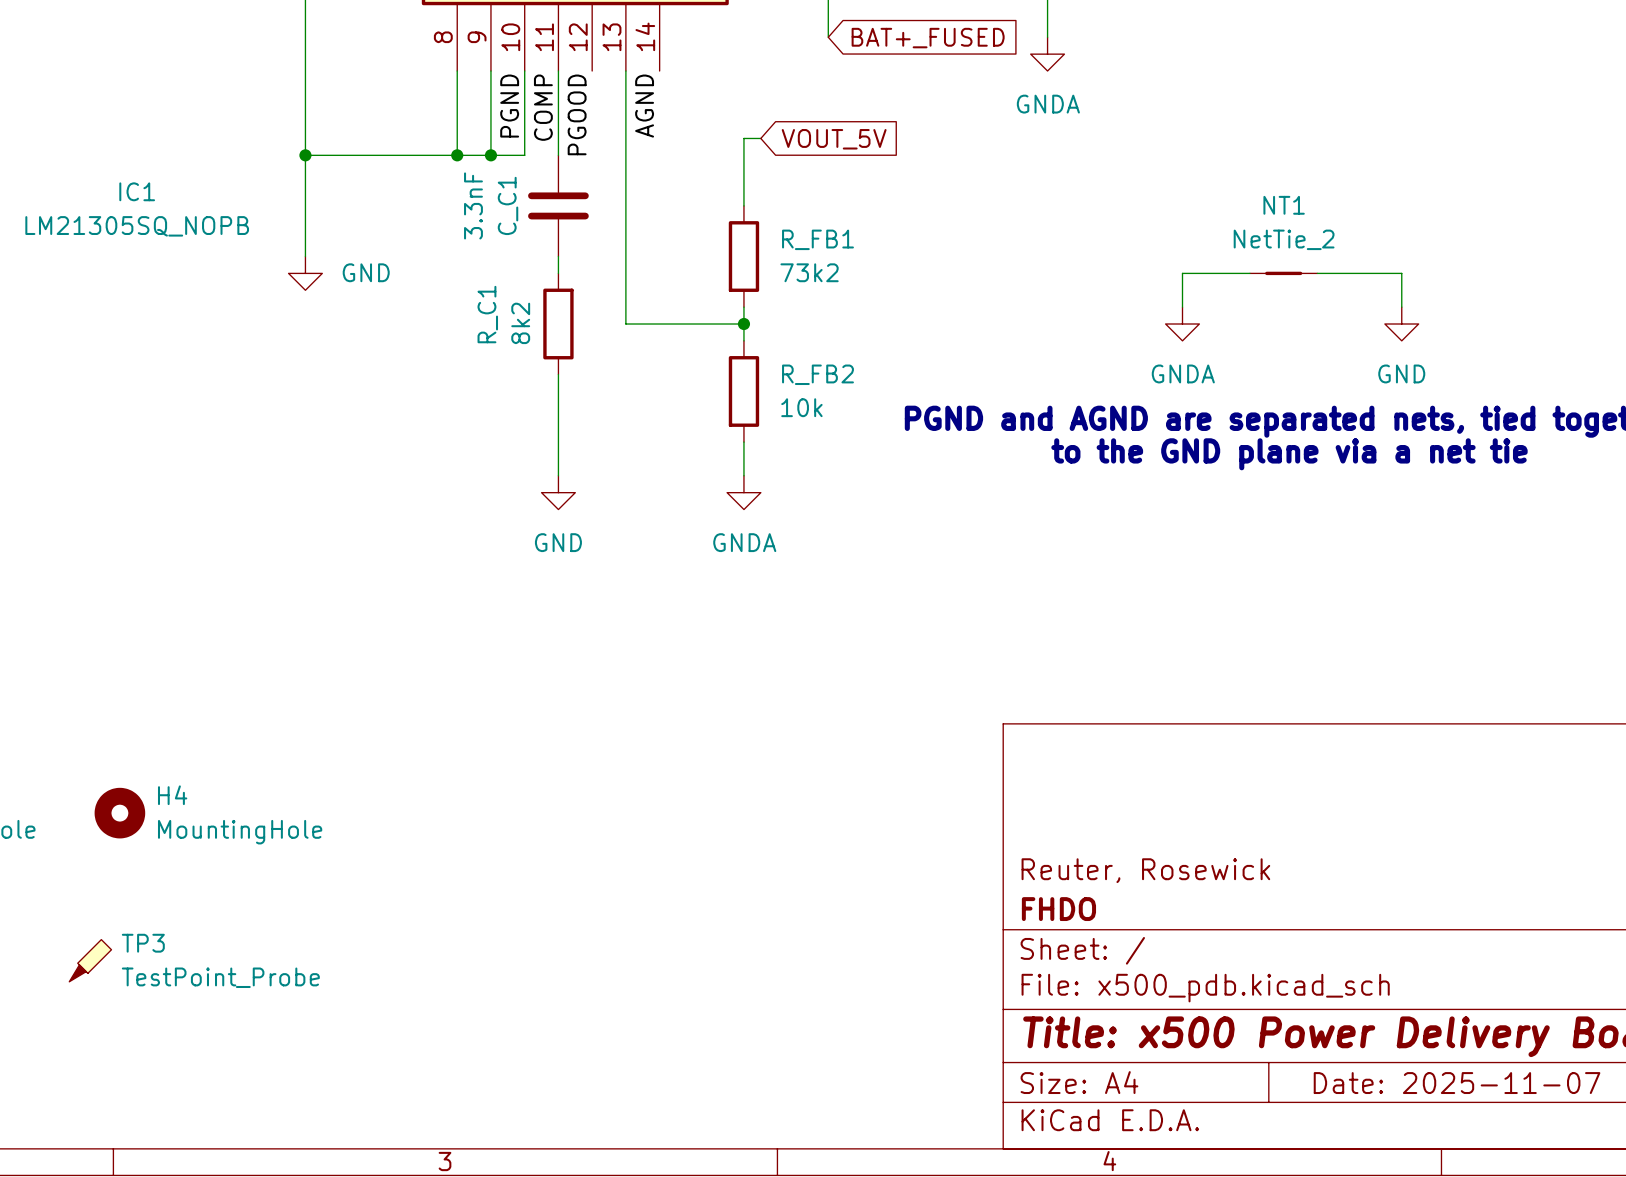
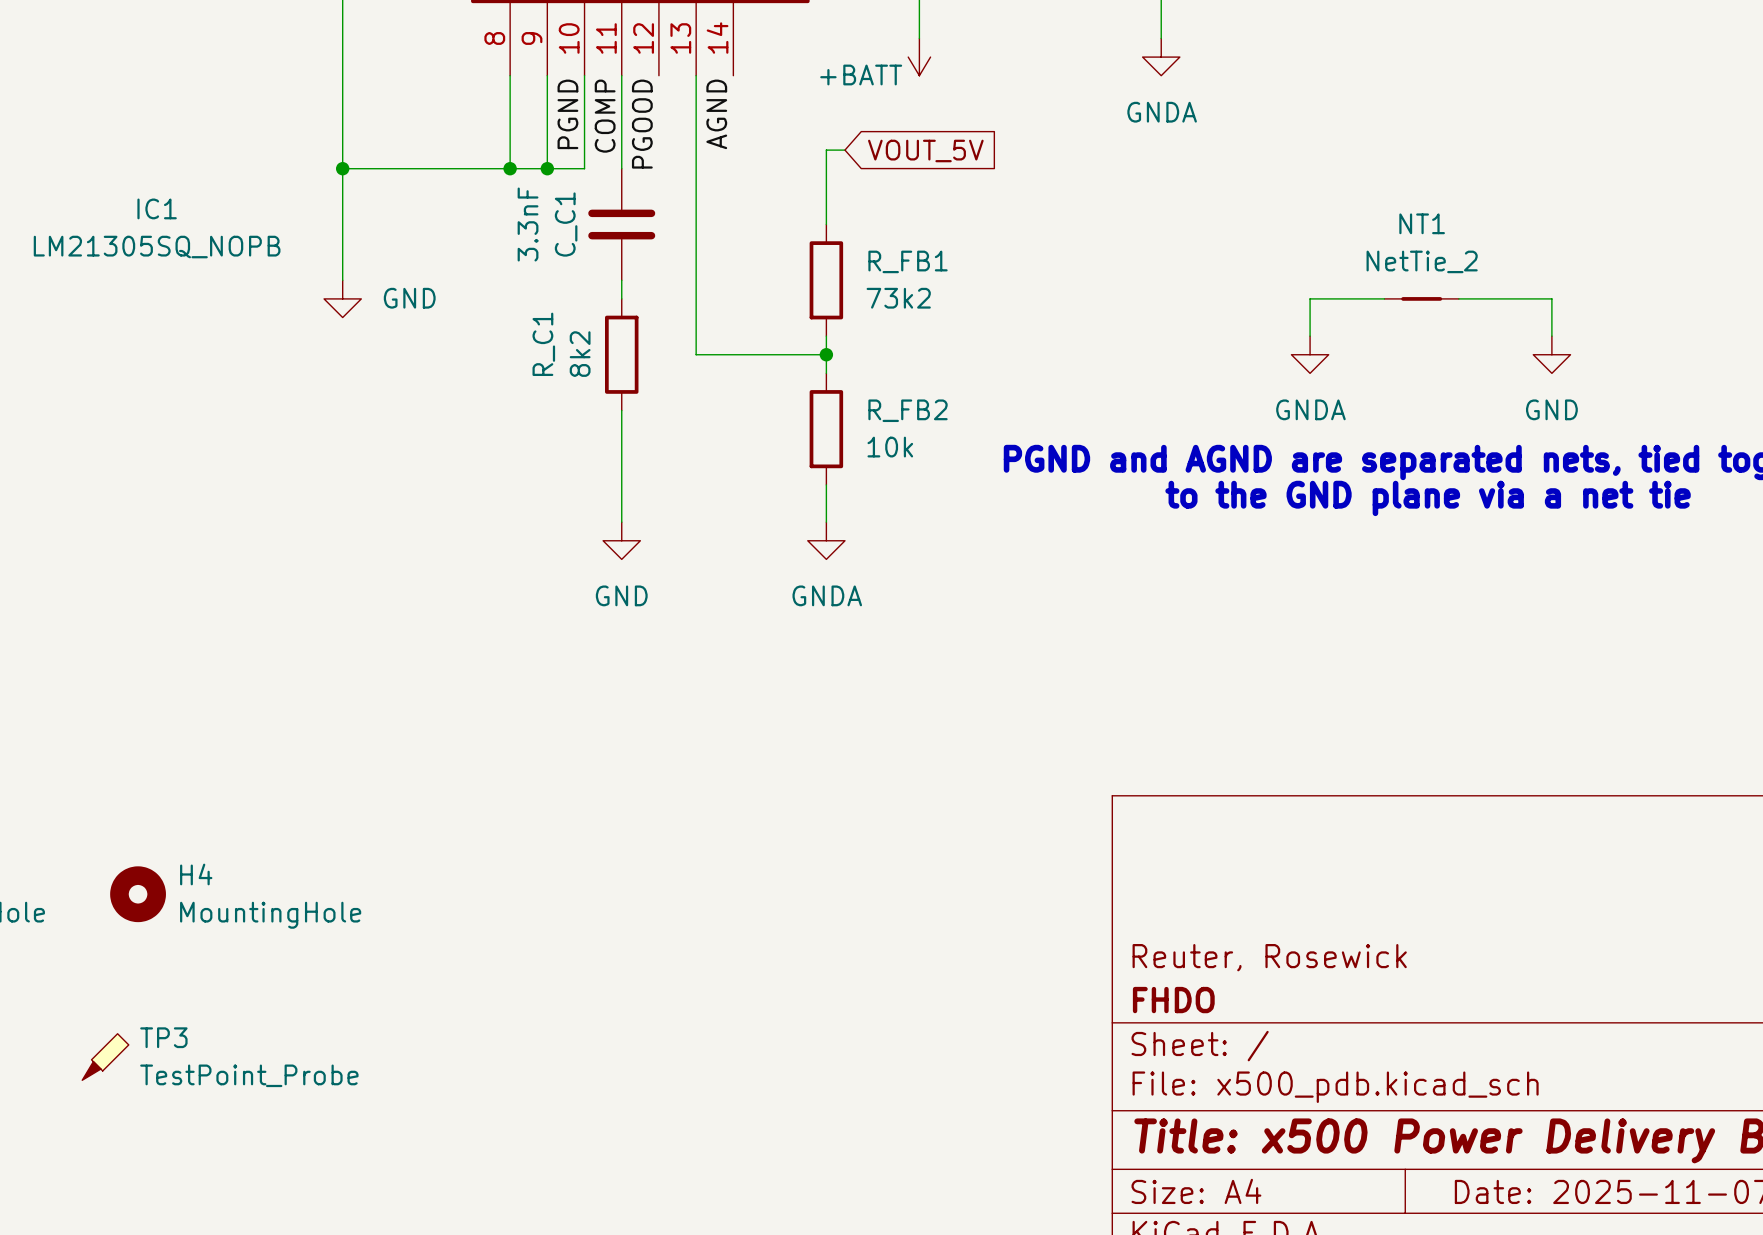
global label: BAT+_FUSED (928, 38) -> none
power symbol: none -> +BATT (919, 57)

